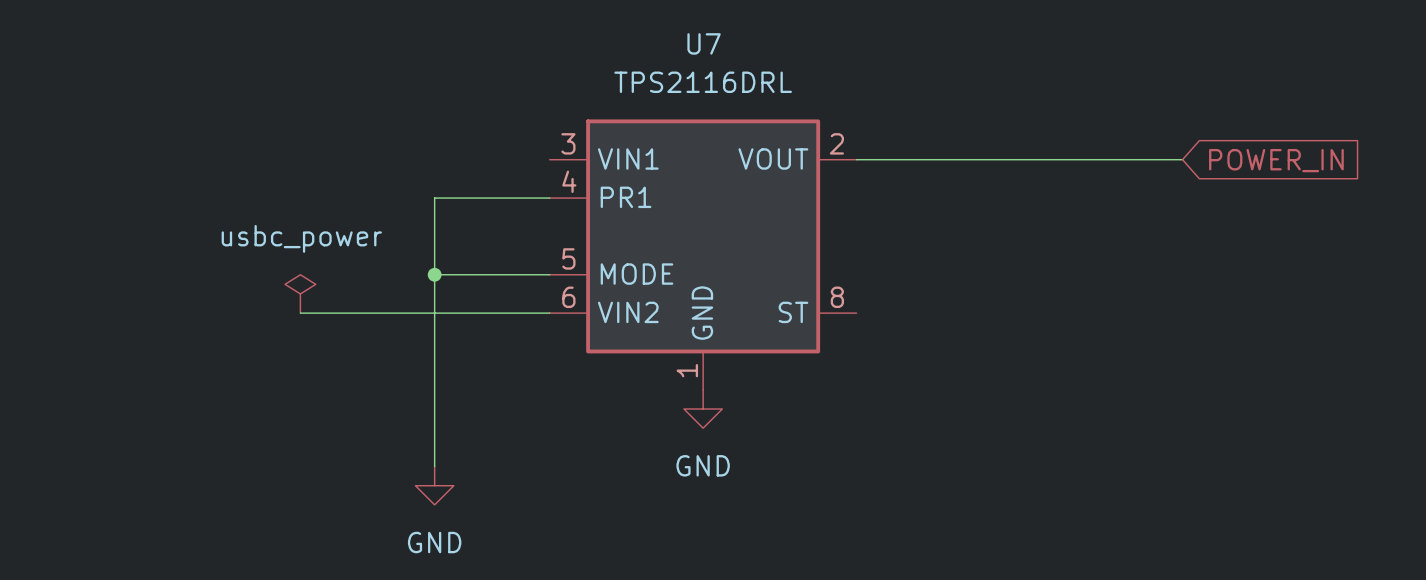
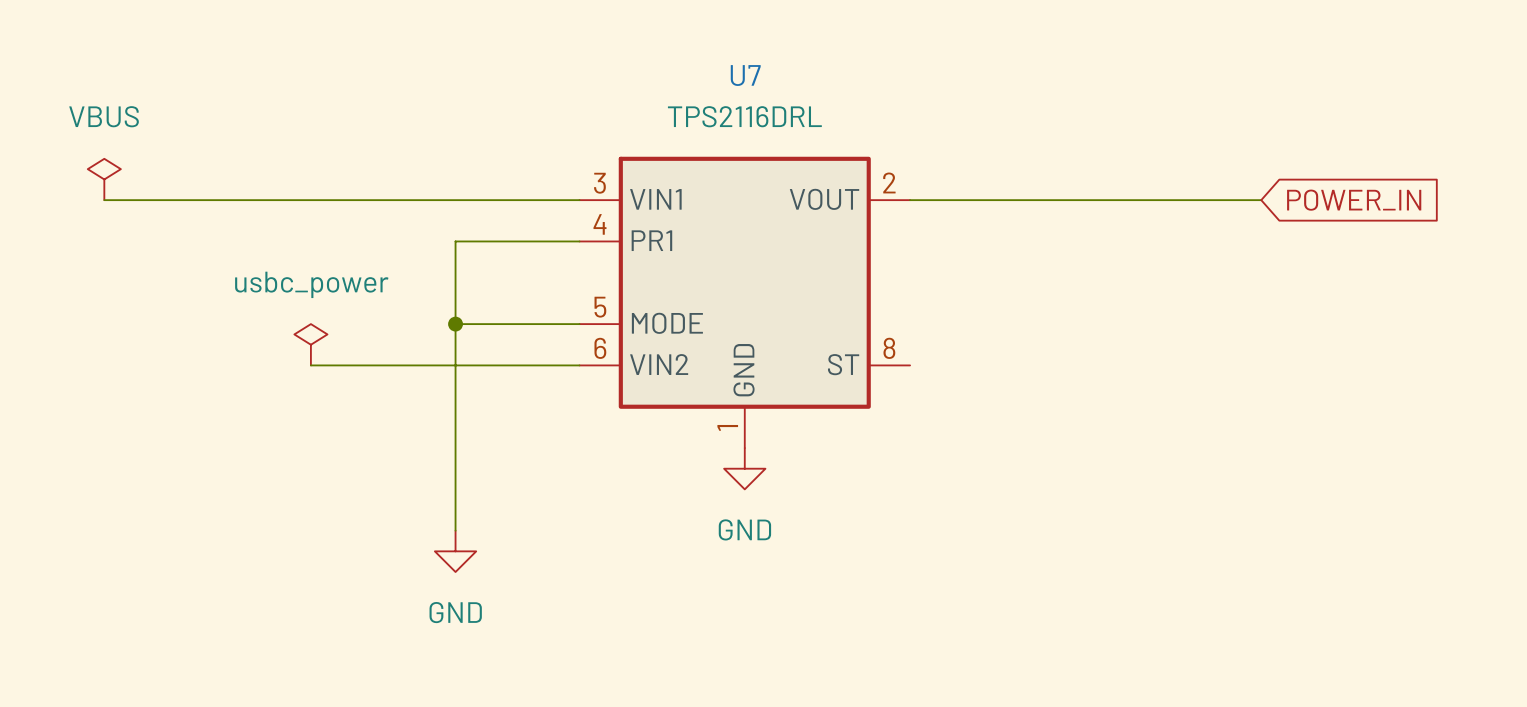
power symbol: none -> VBUS (104, 179)
wire: none -> (104, 200) (579, 200)

